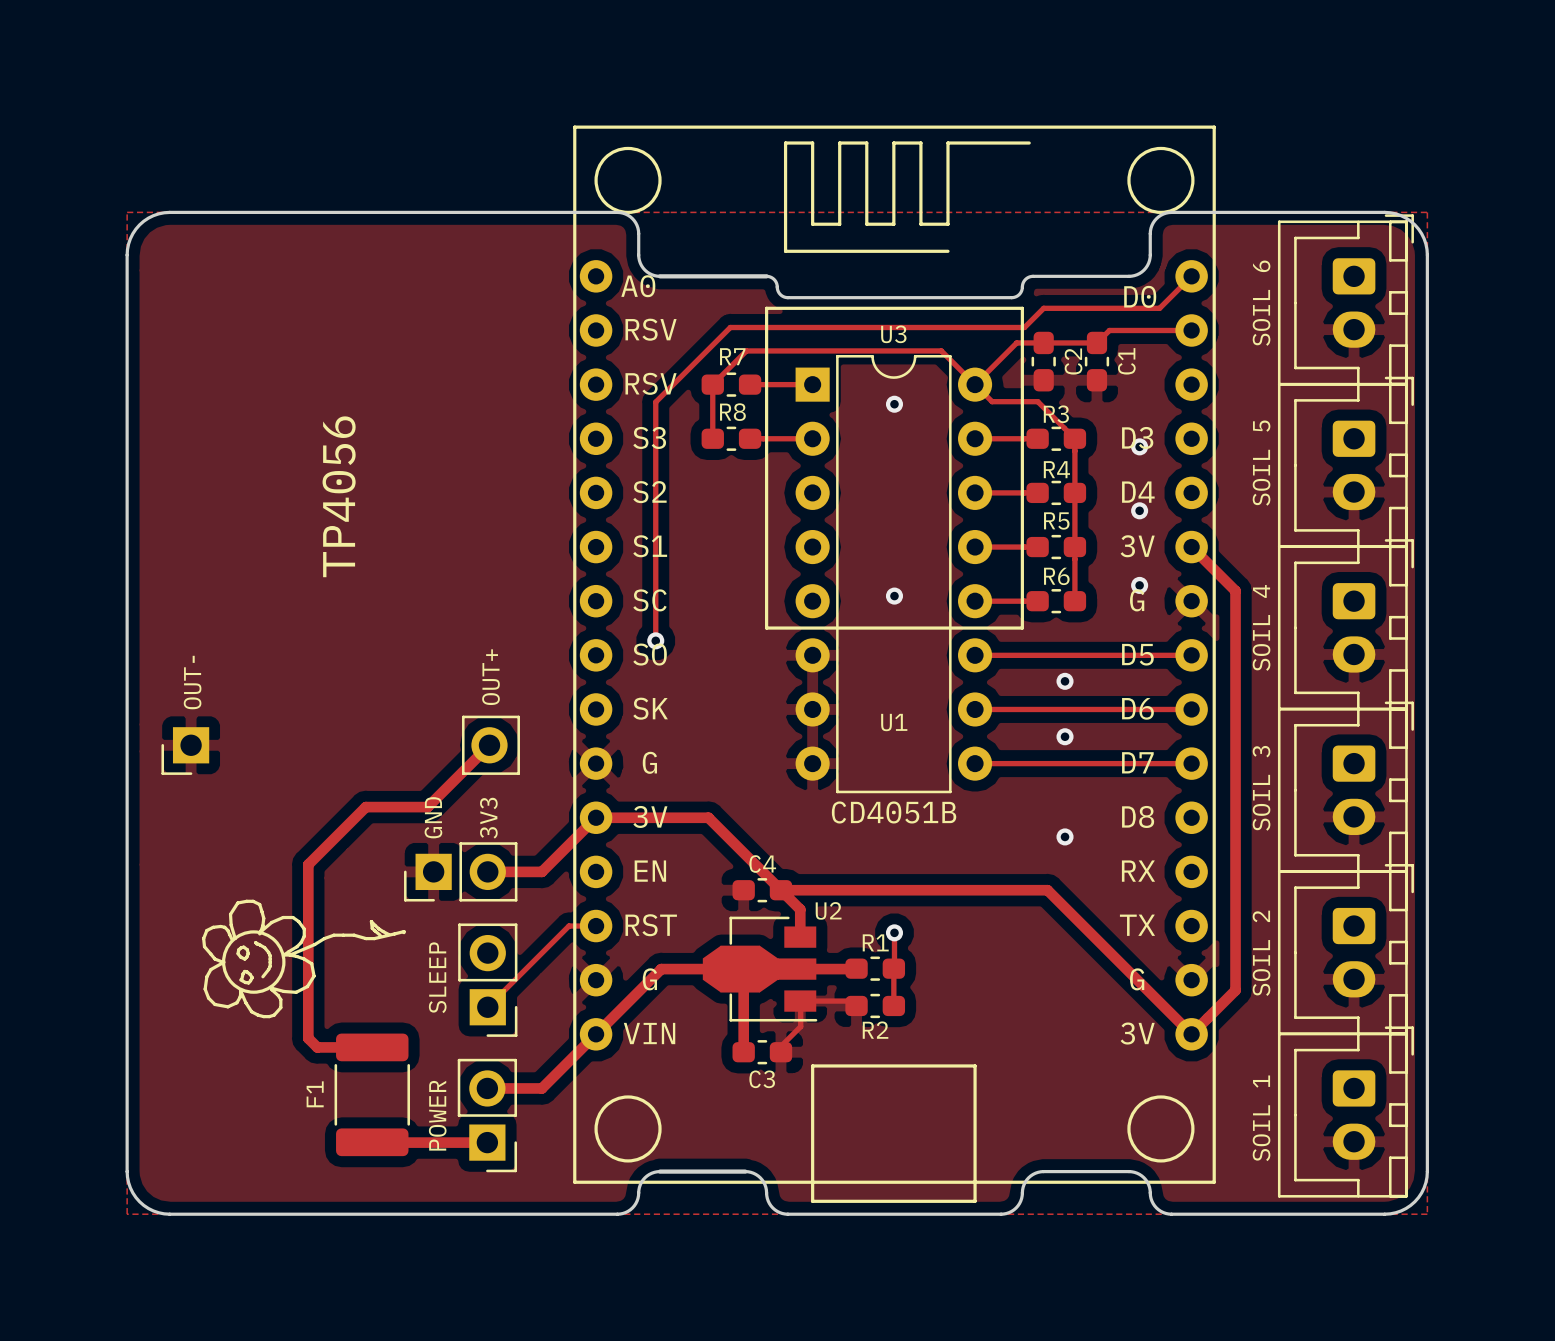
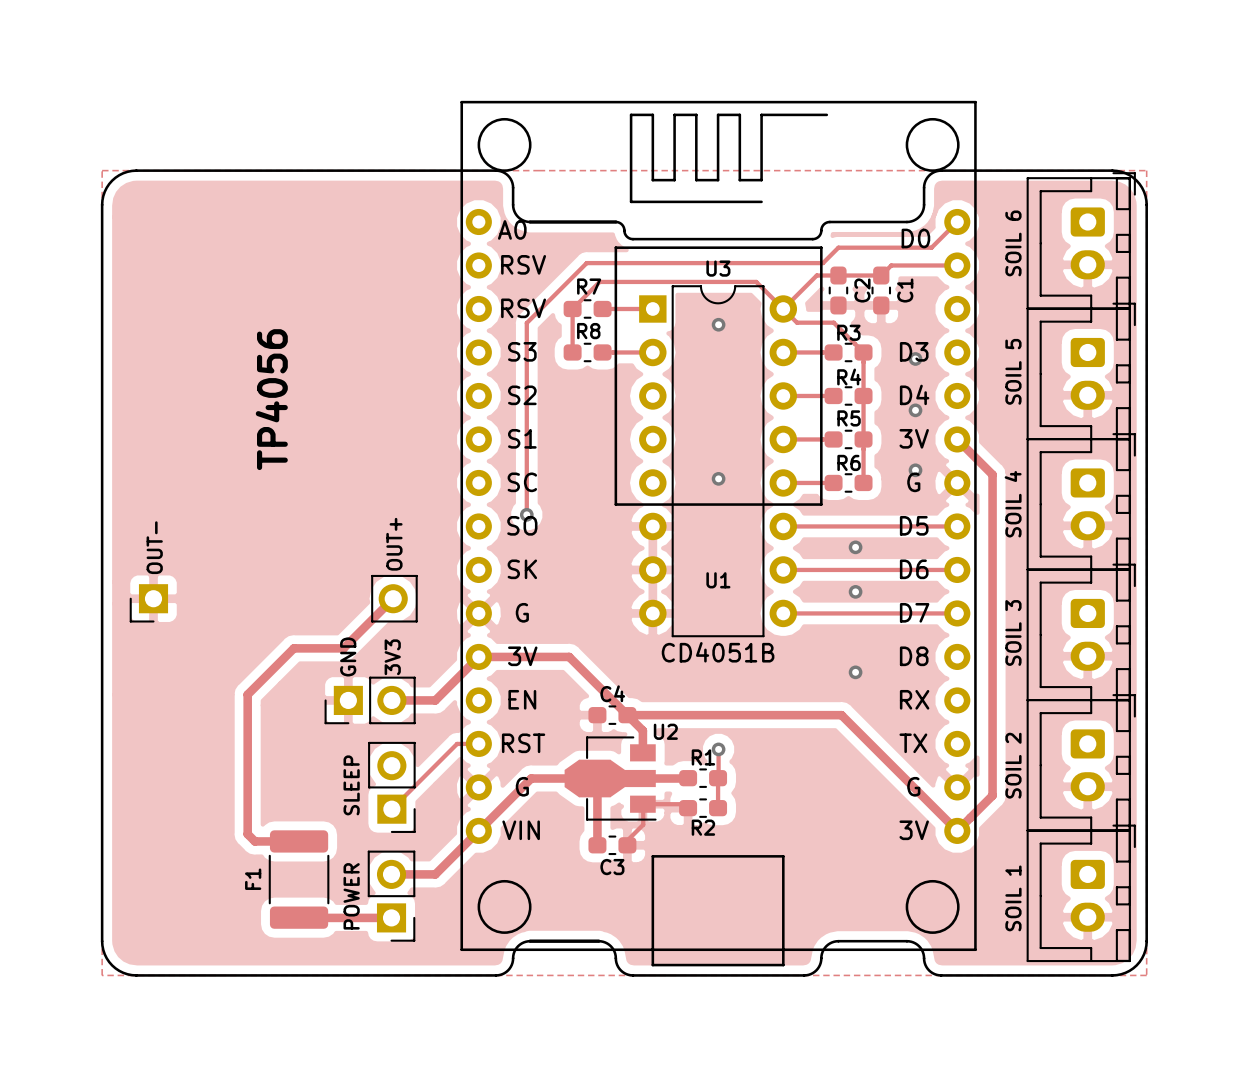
drawing: [202, 899, 406, 1019] -> none

